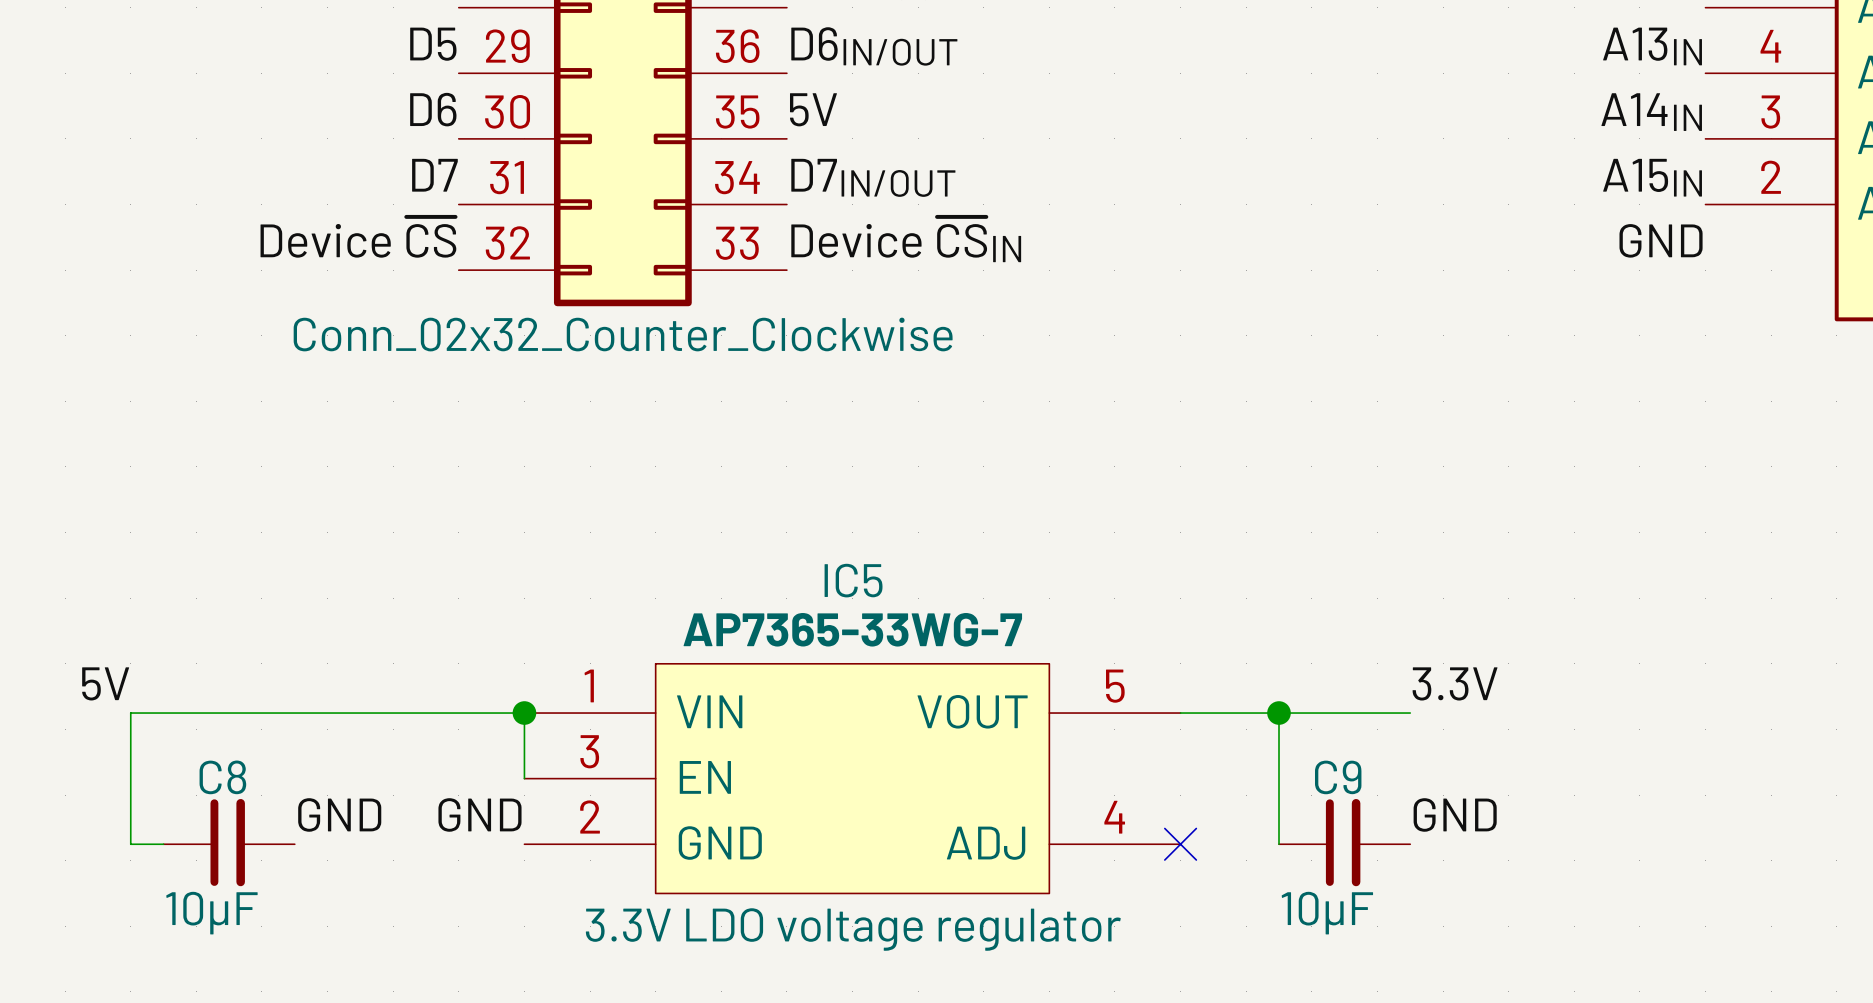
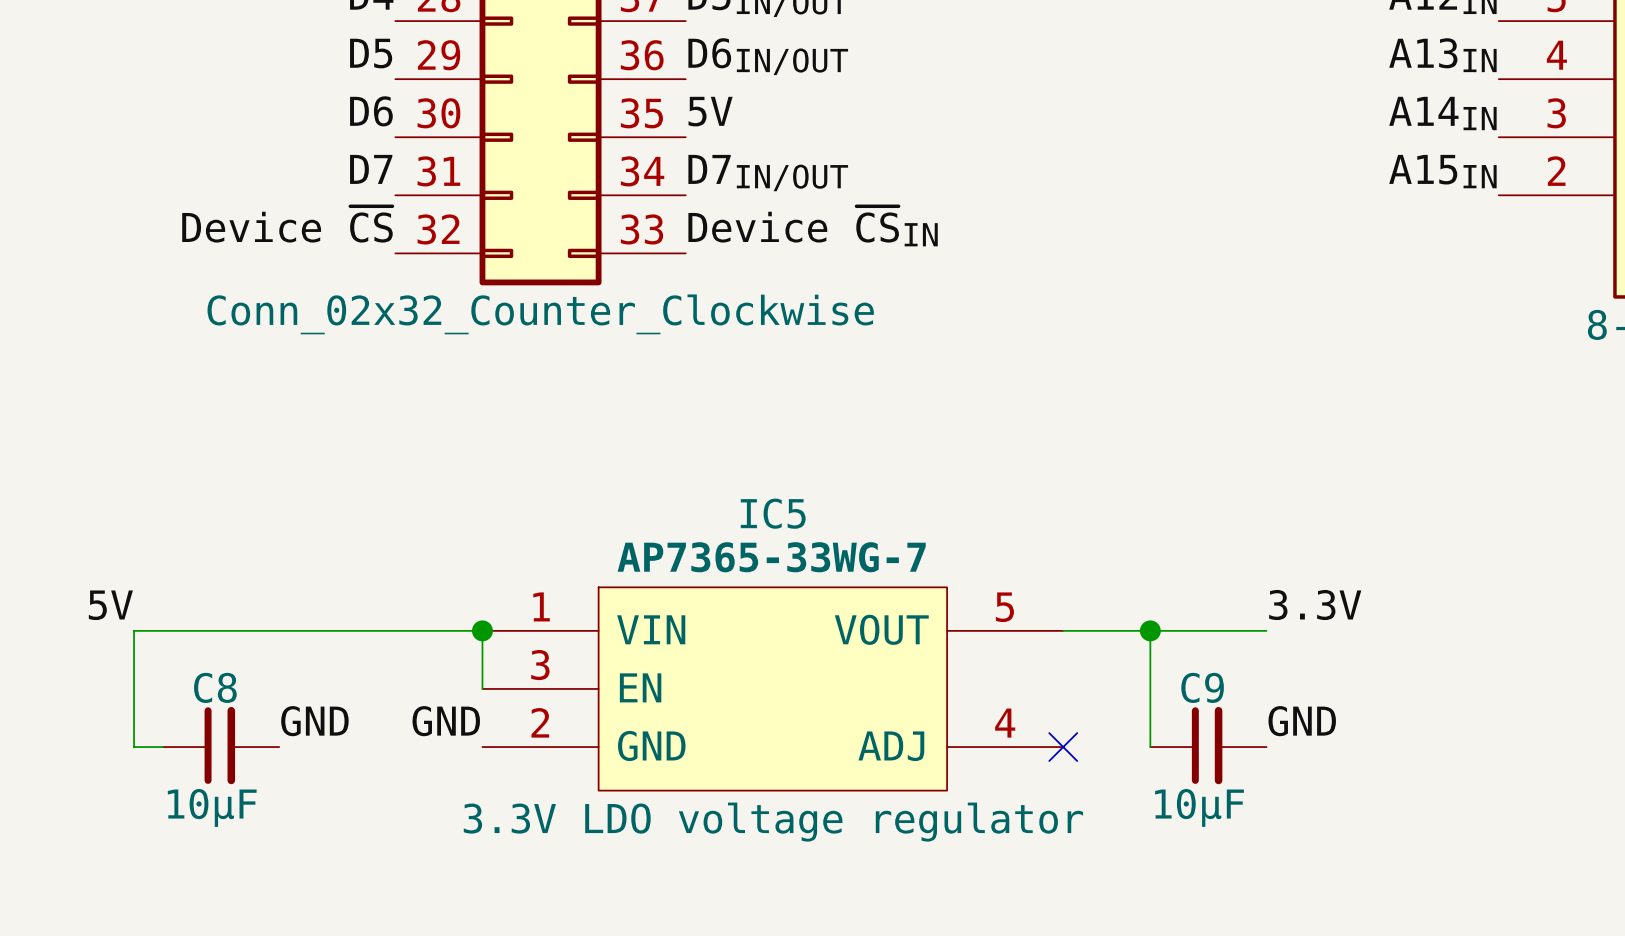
label: GND (1661, 240) -> none
label position: 5V (105, 683) -> 5V (110, 605)
label position: 3.3V (1455, 683) -> 3.3V (1315, 605)
junction position: (524, 713) -> (482, 630)
wire: (1180, 713) (1410, 713) -> (1063, 630) (1266, 630)
wire: (1279, 713) (1279, 844) -> (1150, 630) (1150, 747)
junction position: (1279, 713) -> (1150, 630)
wire: (524, 778) (524, 713) (130, 713) (130, 844) (163, 844) -> (482, 688) (482, 630) (134, 630) (134, 747) (163, 747)
IC5 position: (852, 778) -> (772, 688)
label position: GND (339, 814) -> GND (314, 721)
label position: GND (479, 814) -> GND (446, 721)
label position: GND (1455, 814) -> GND (1302, 721)
C8 position: (229, 842) -> (221, 745)
C9 position: (1344, 842) -> (1208, 745)
no-connect mark position: (1180, 844) -> (1063, 747)

